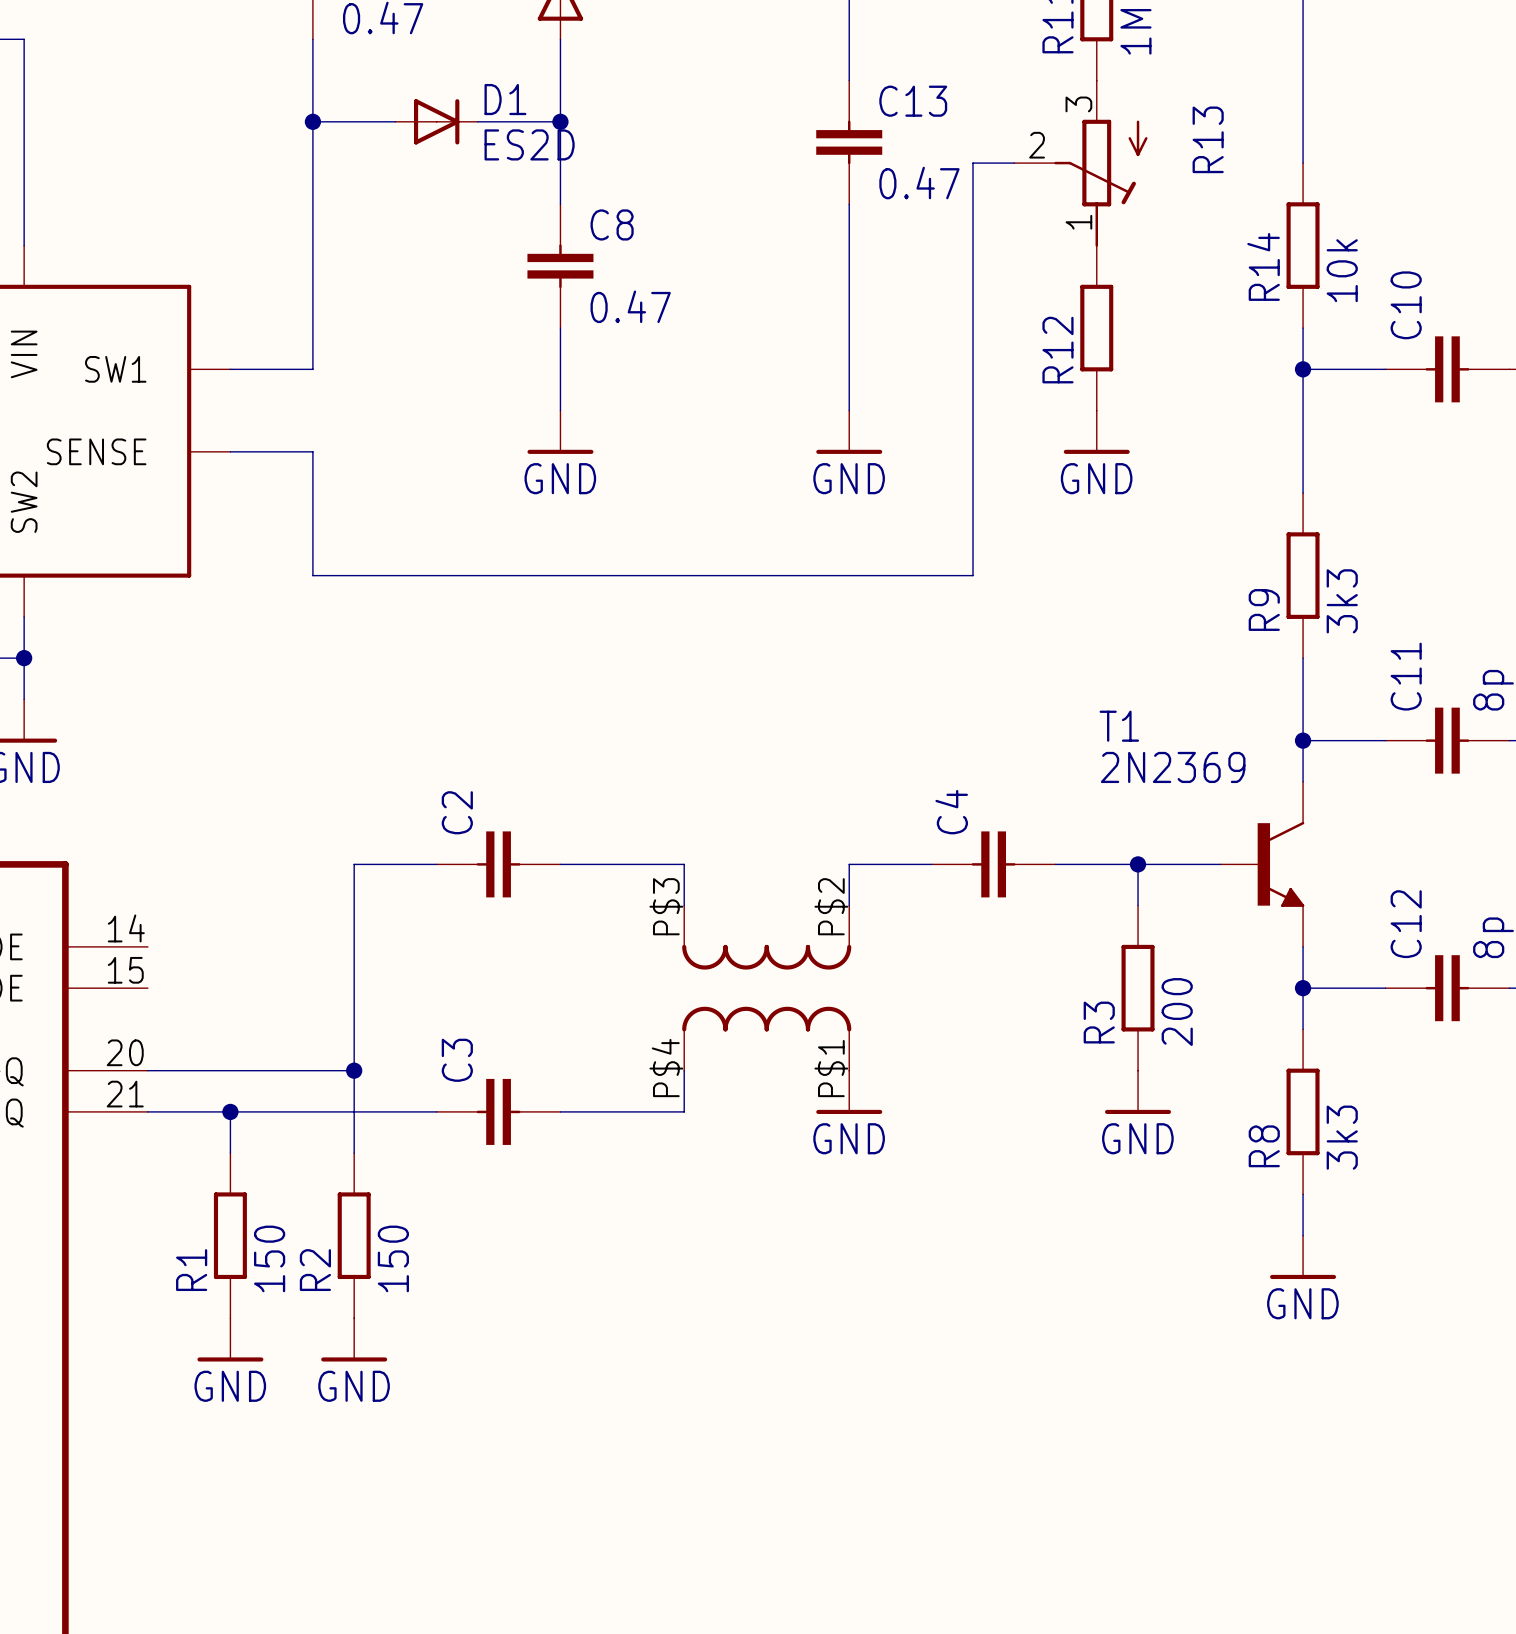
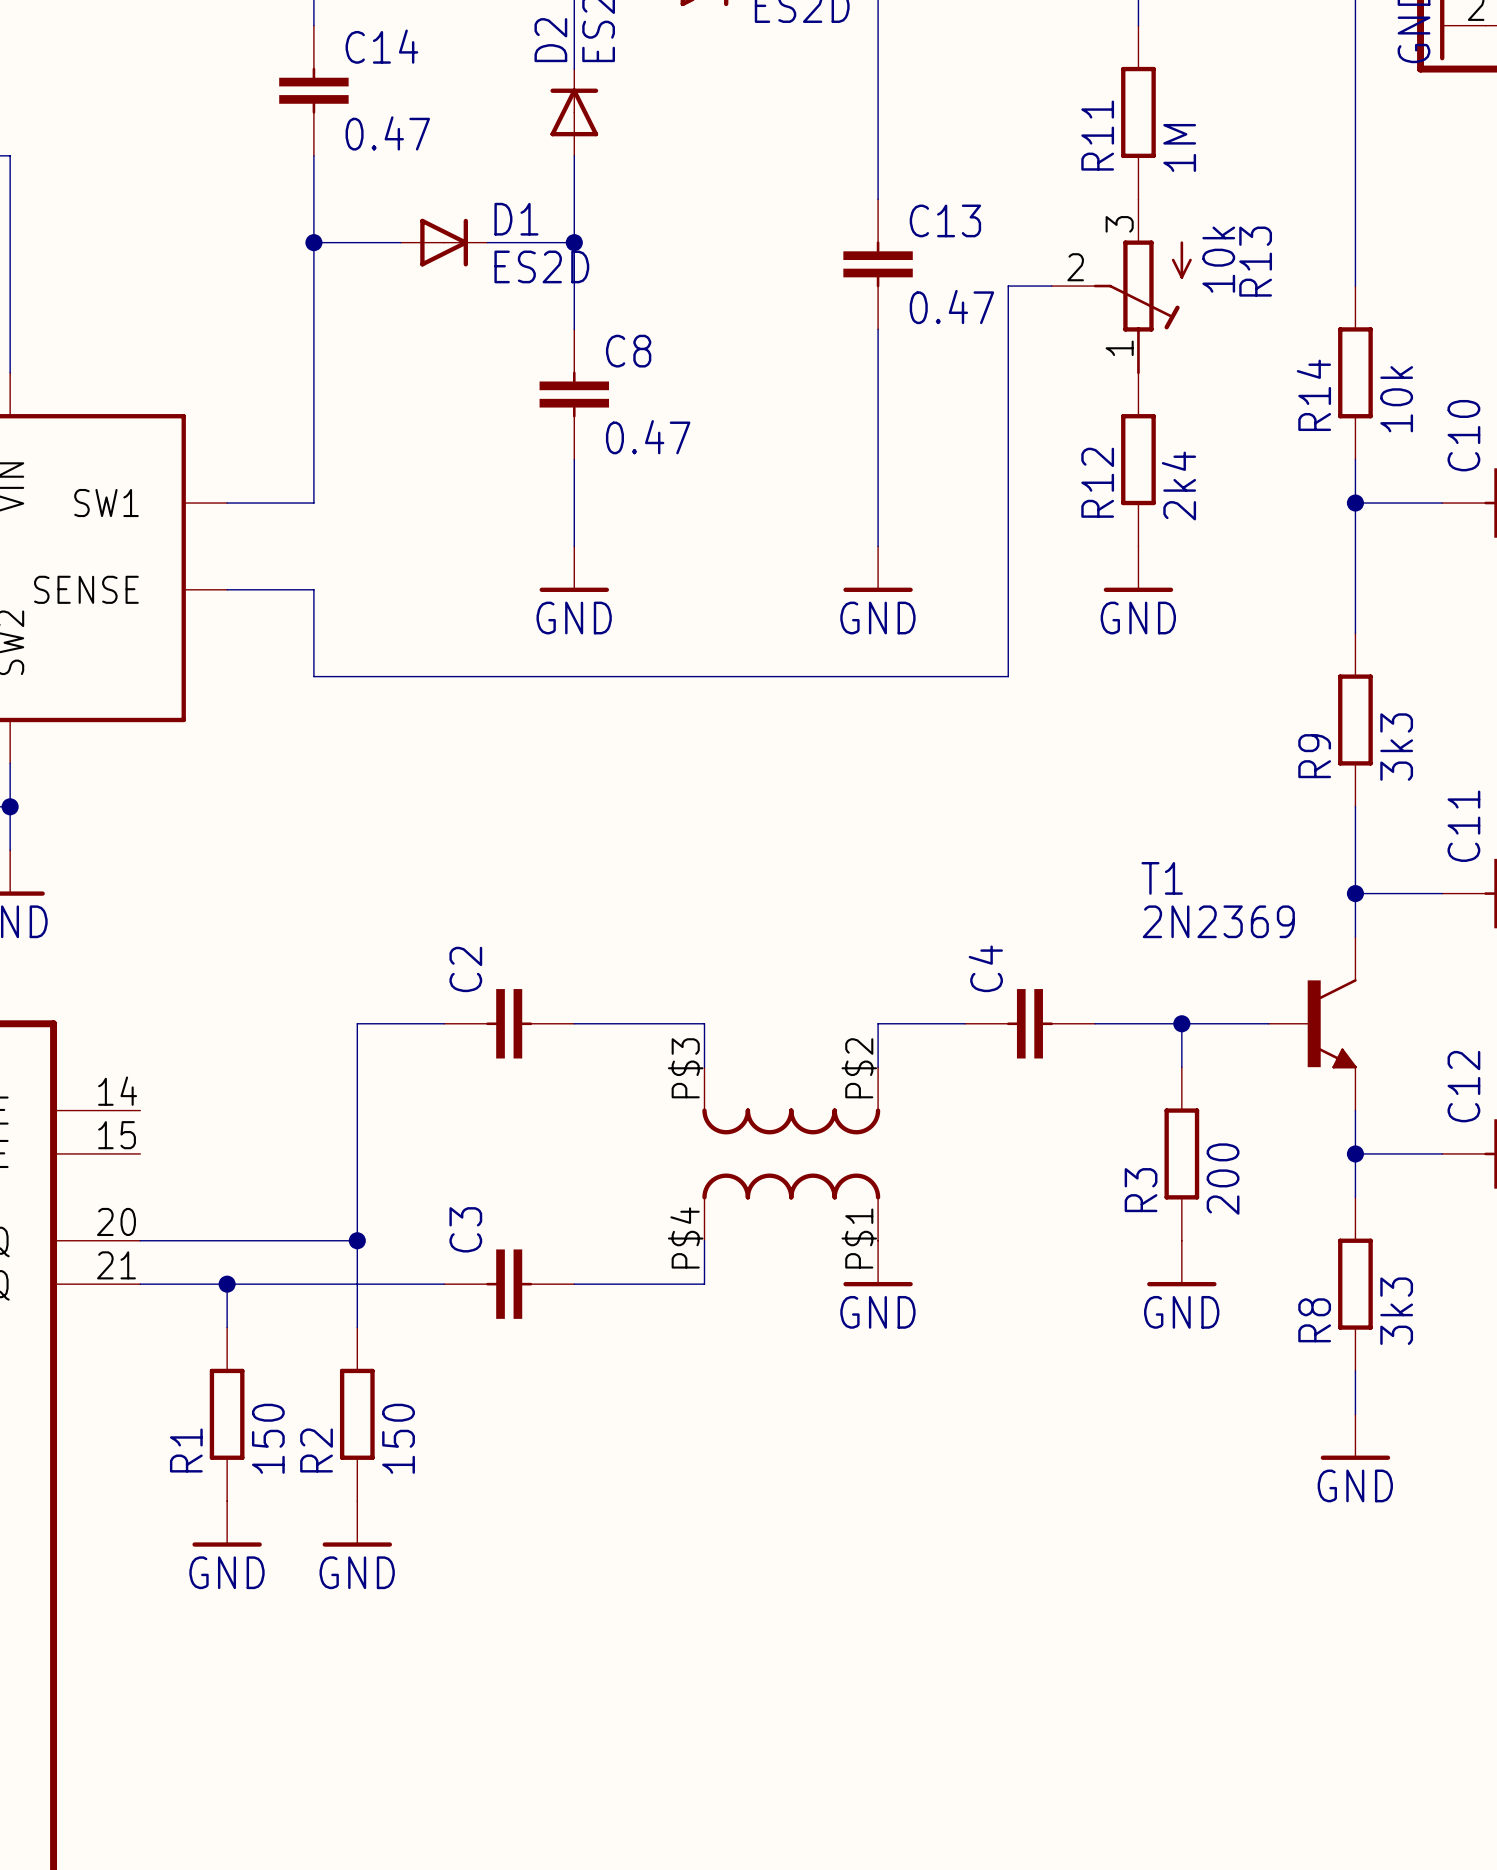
R13 value: none -> 10k (1218, 259)
R12 value: none -> 2k4 (1178, 486)
wire: (312, 534) (312, 575) (973, 575) (973, 534) -> (313, 676) (1008, 676)

